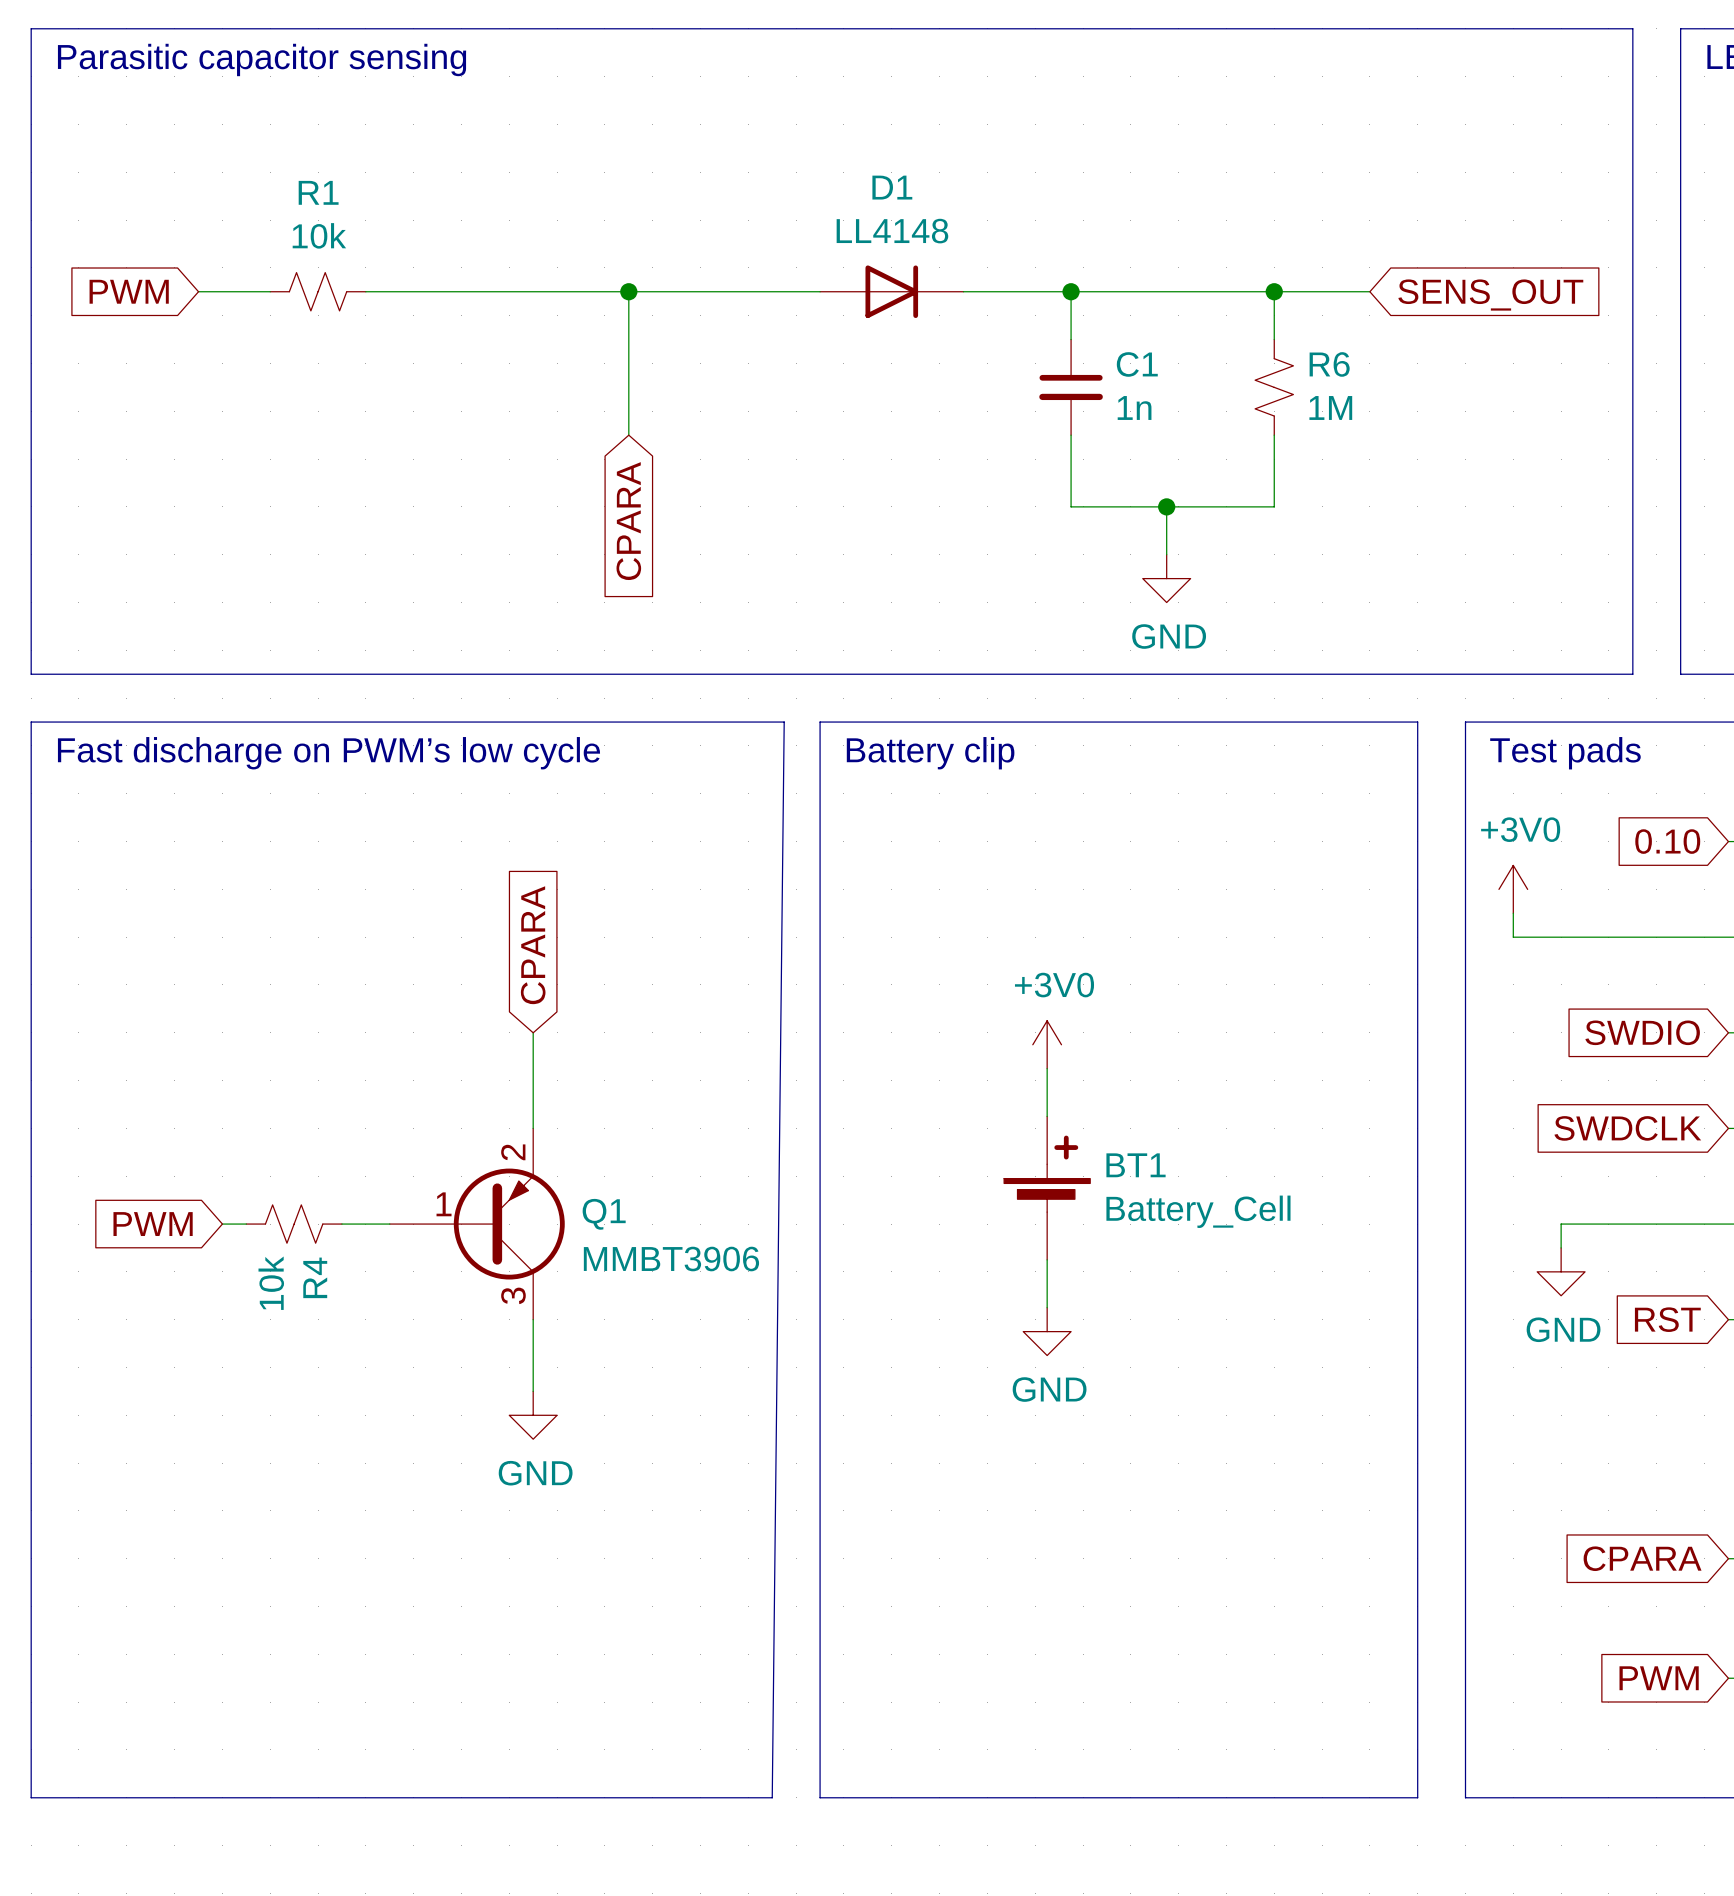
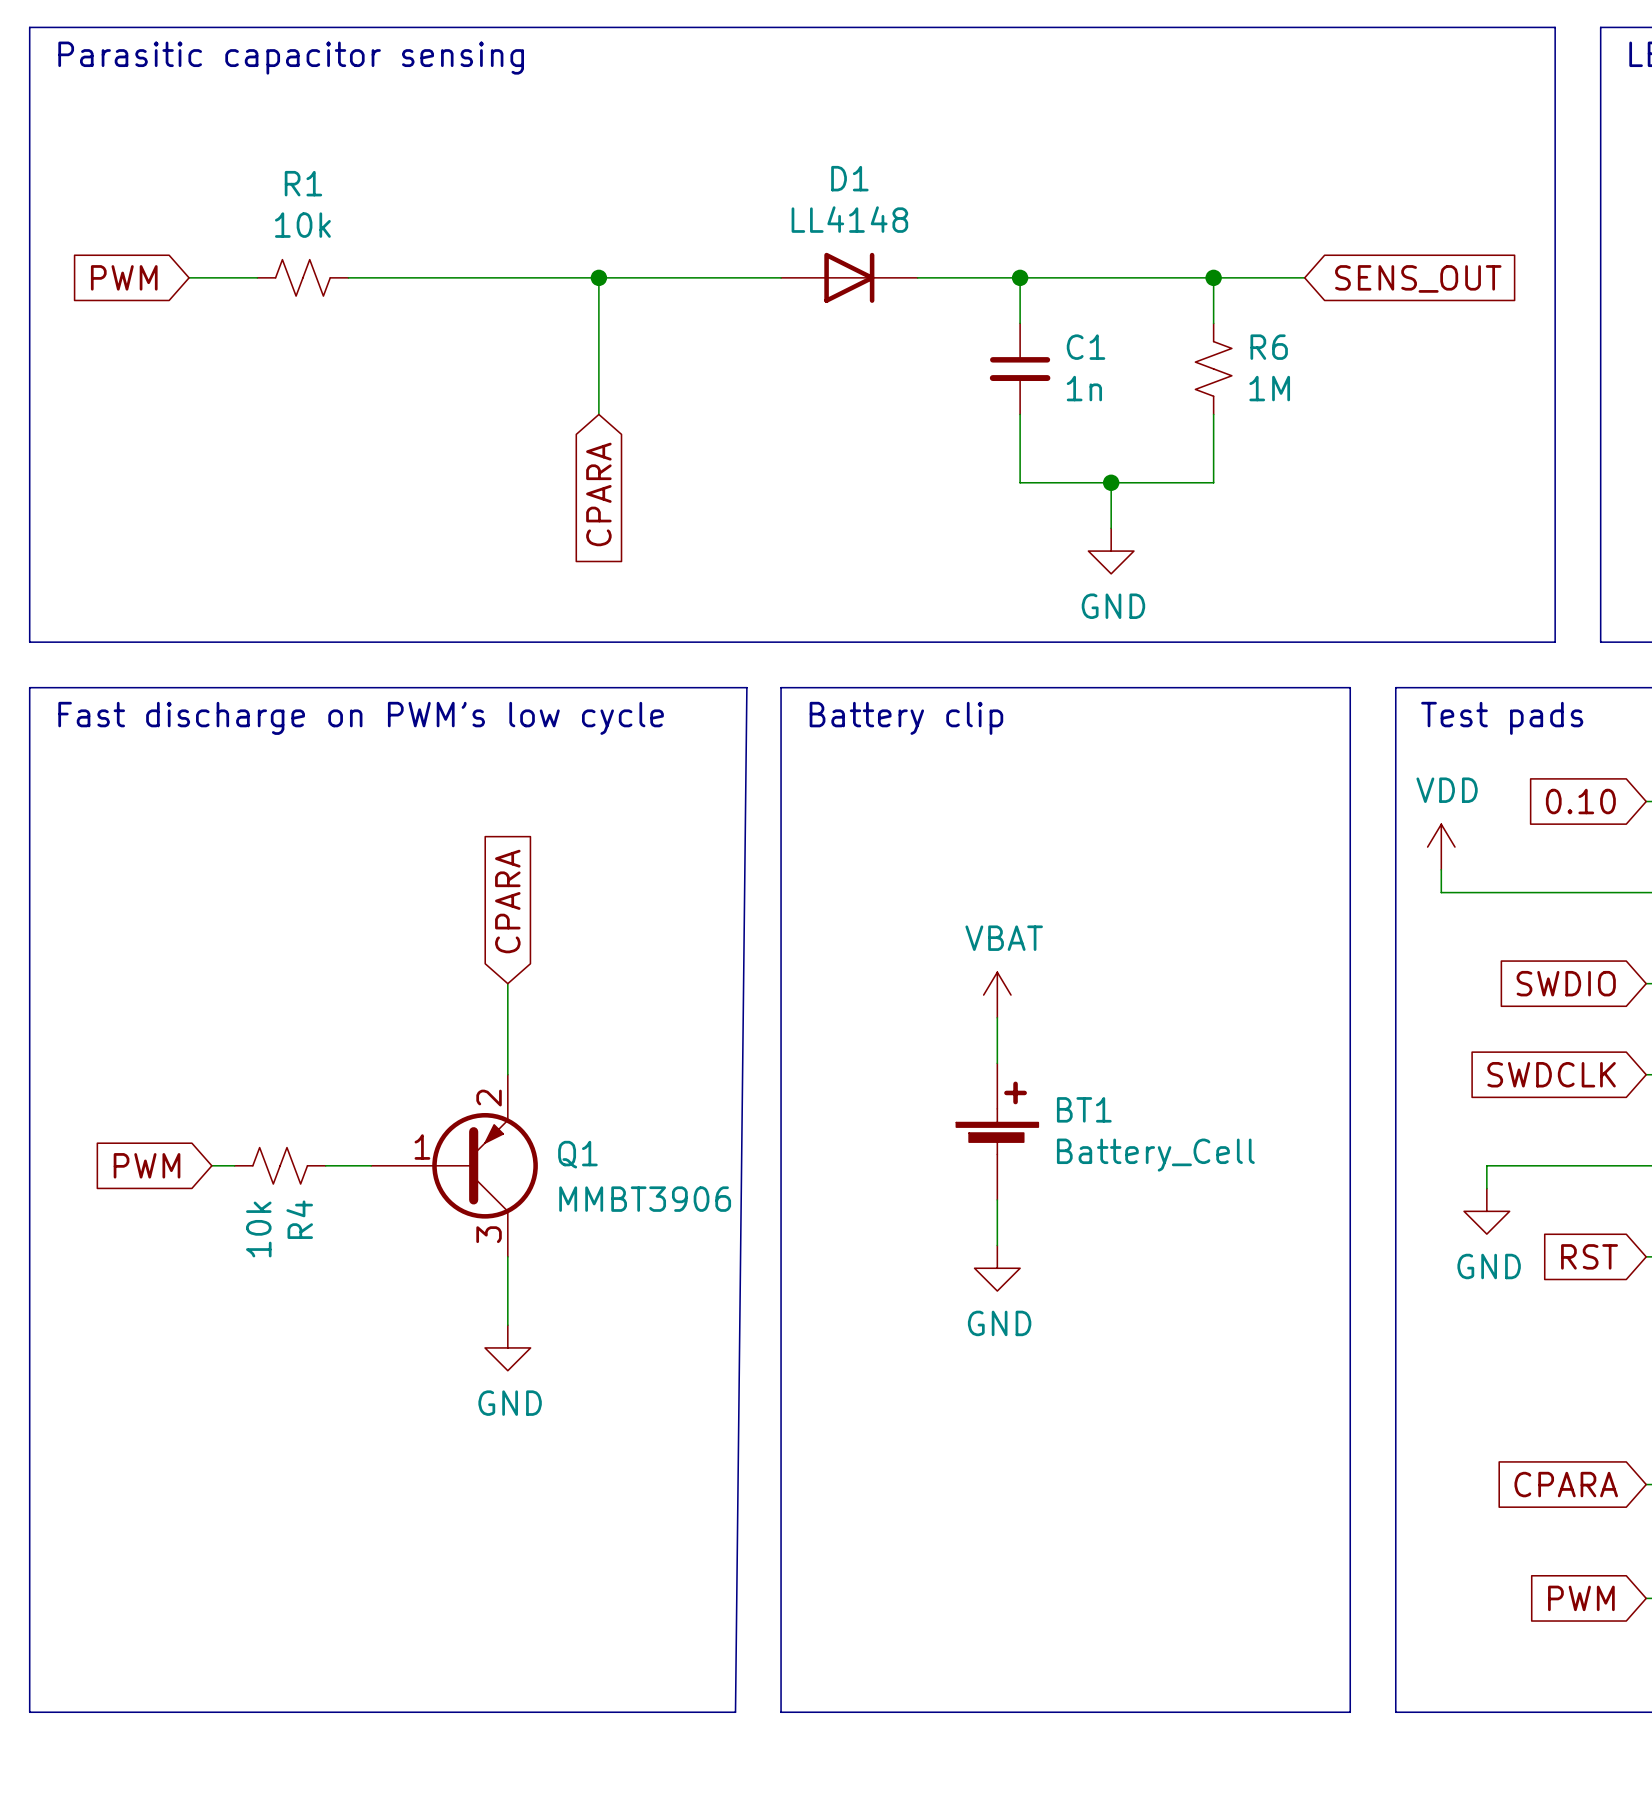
power symbol: +3V0 (1513, 889) -> VDD (1441, 847)
power symbol: +3V0 (1047, 1044) -> VBAT (997, 995)

